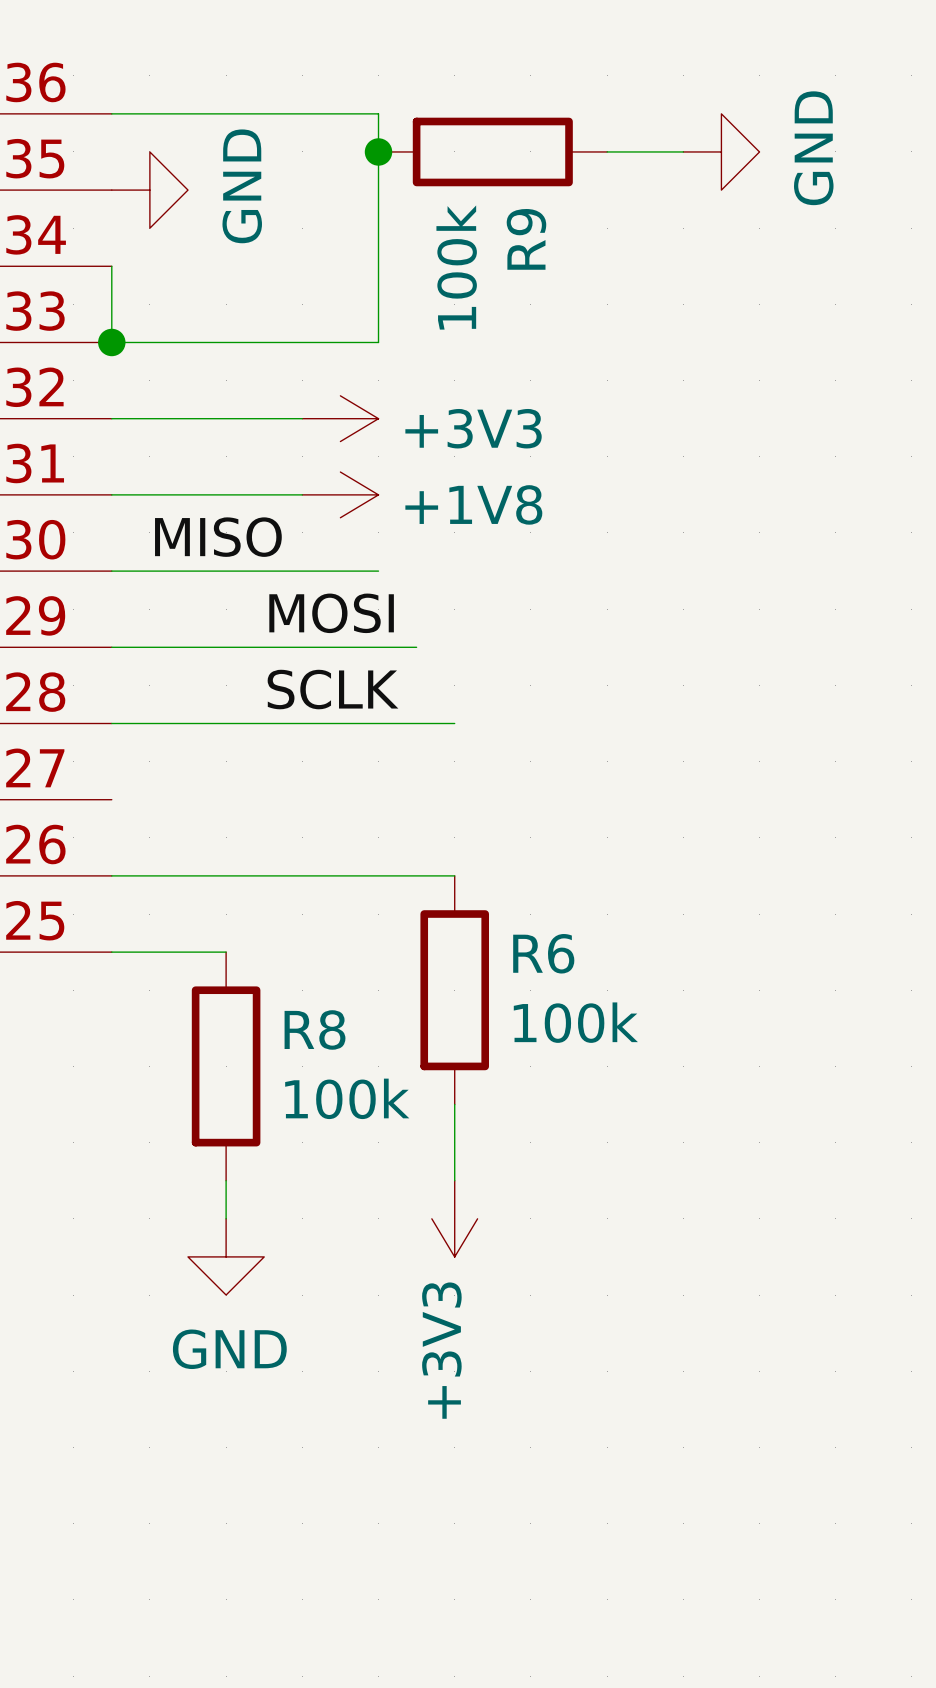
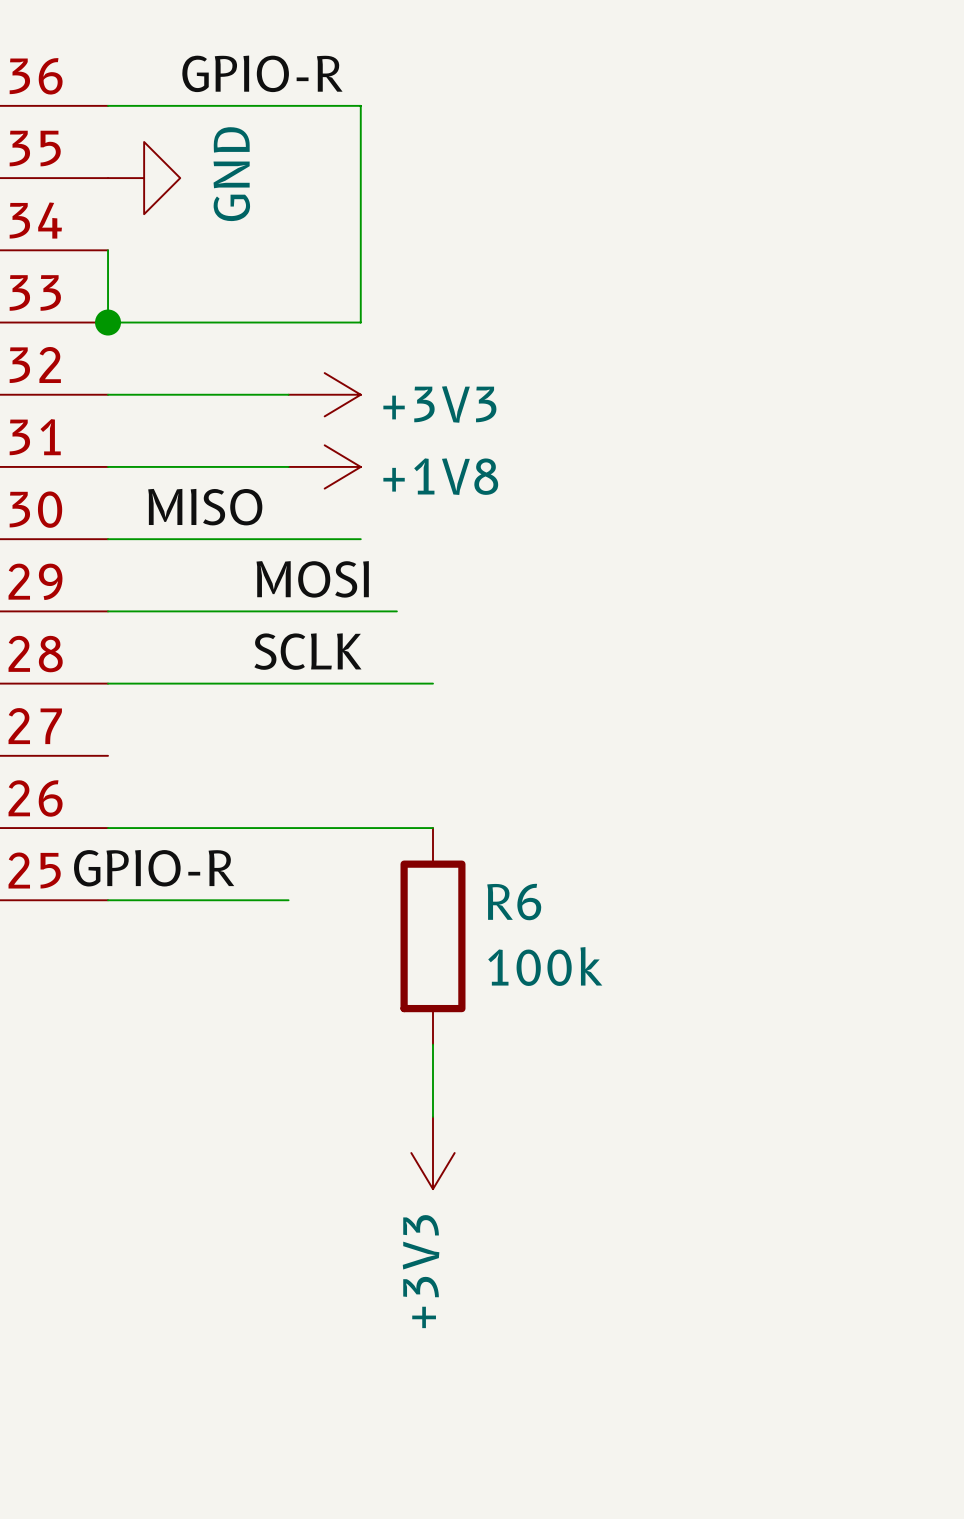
label: none -> GPIO-R (262, 73)
junction: (378, 151) -> none
R9: 100k (492, 151) -> none
wire: (607, 151) (683, 151) -> none
power symbol: GND (721, 151) -> none
label: none -> GPIO-R (154, 868)
wire: none -> (216, 900) (288, 900)
R8: 100k (226, 1066) -> none
wire: (226, 1180) (226, 1218) -> none
power symbol: GND (226, 1256) -> none

